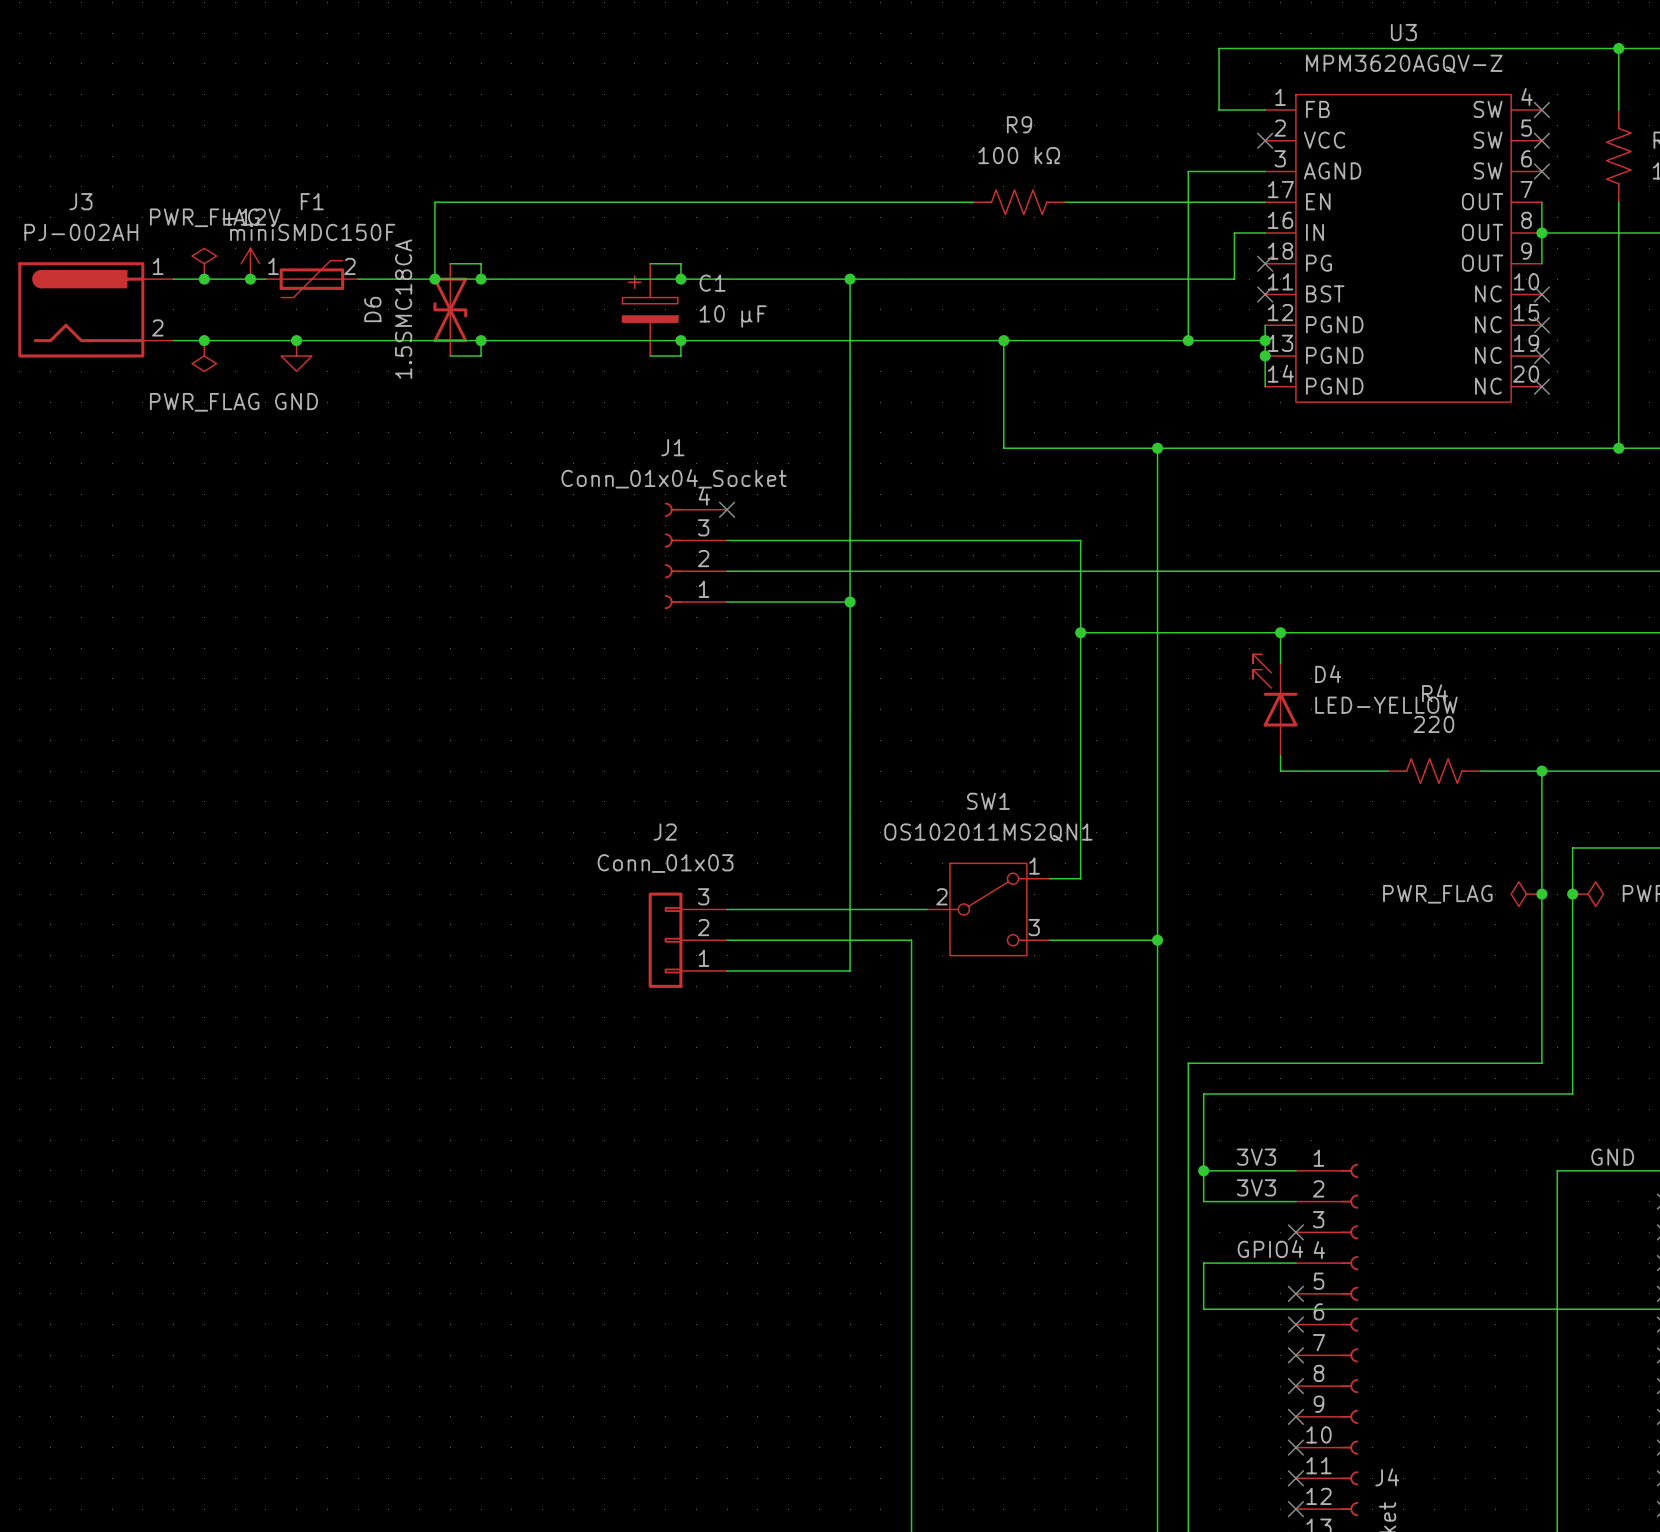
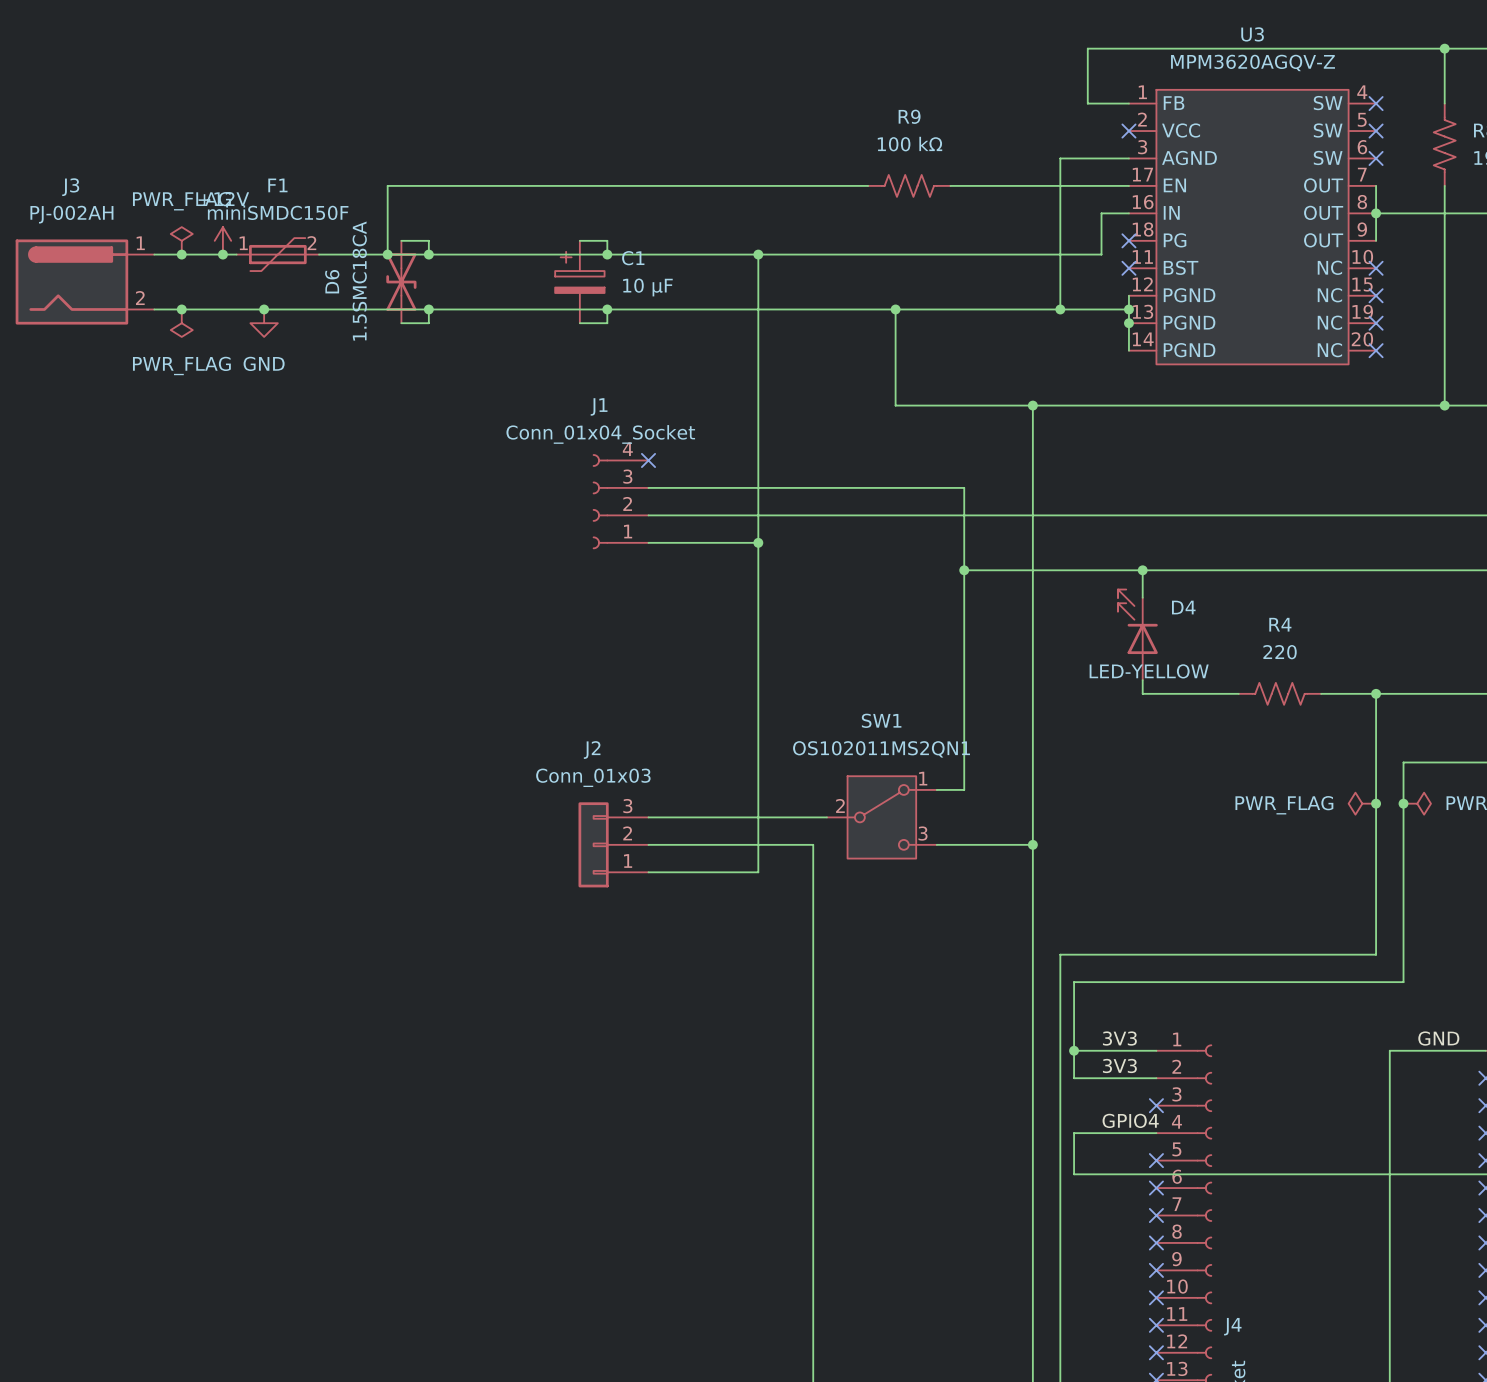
D4 value position: LED-YELLOW (1386, 705) -> LED-YELLOW (1149, 671)

